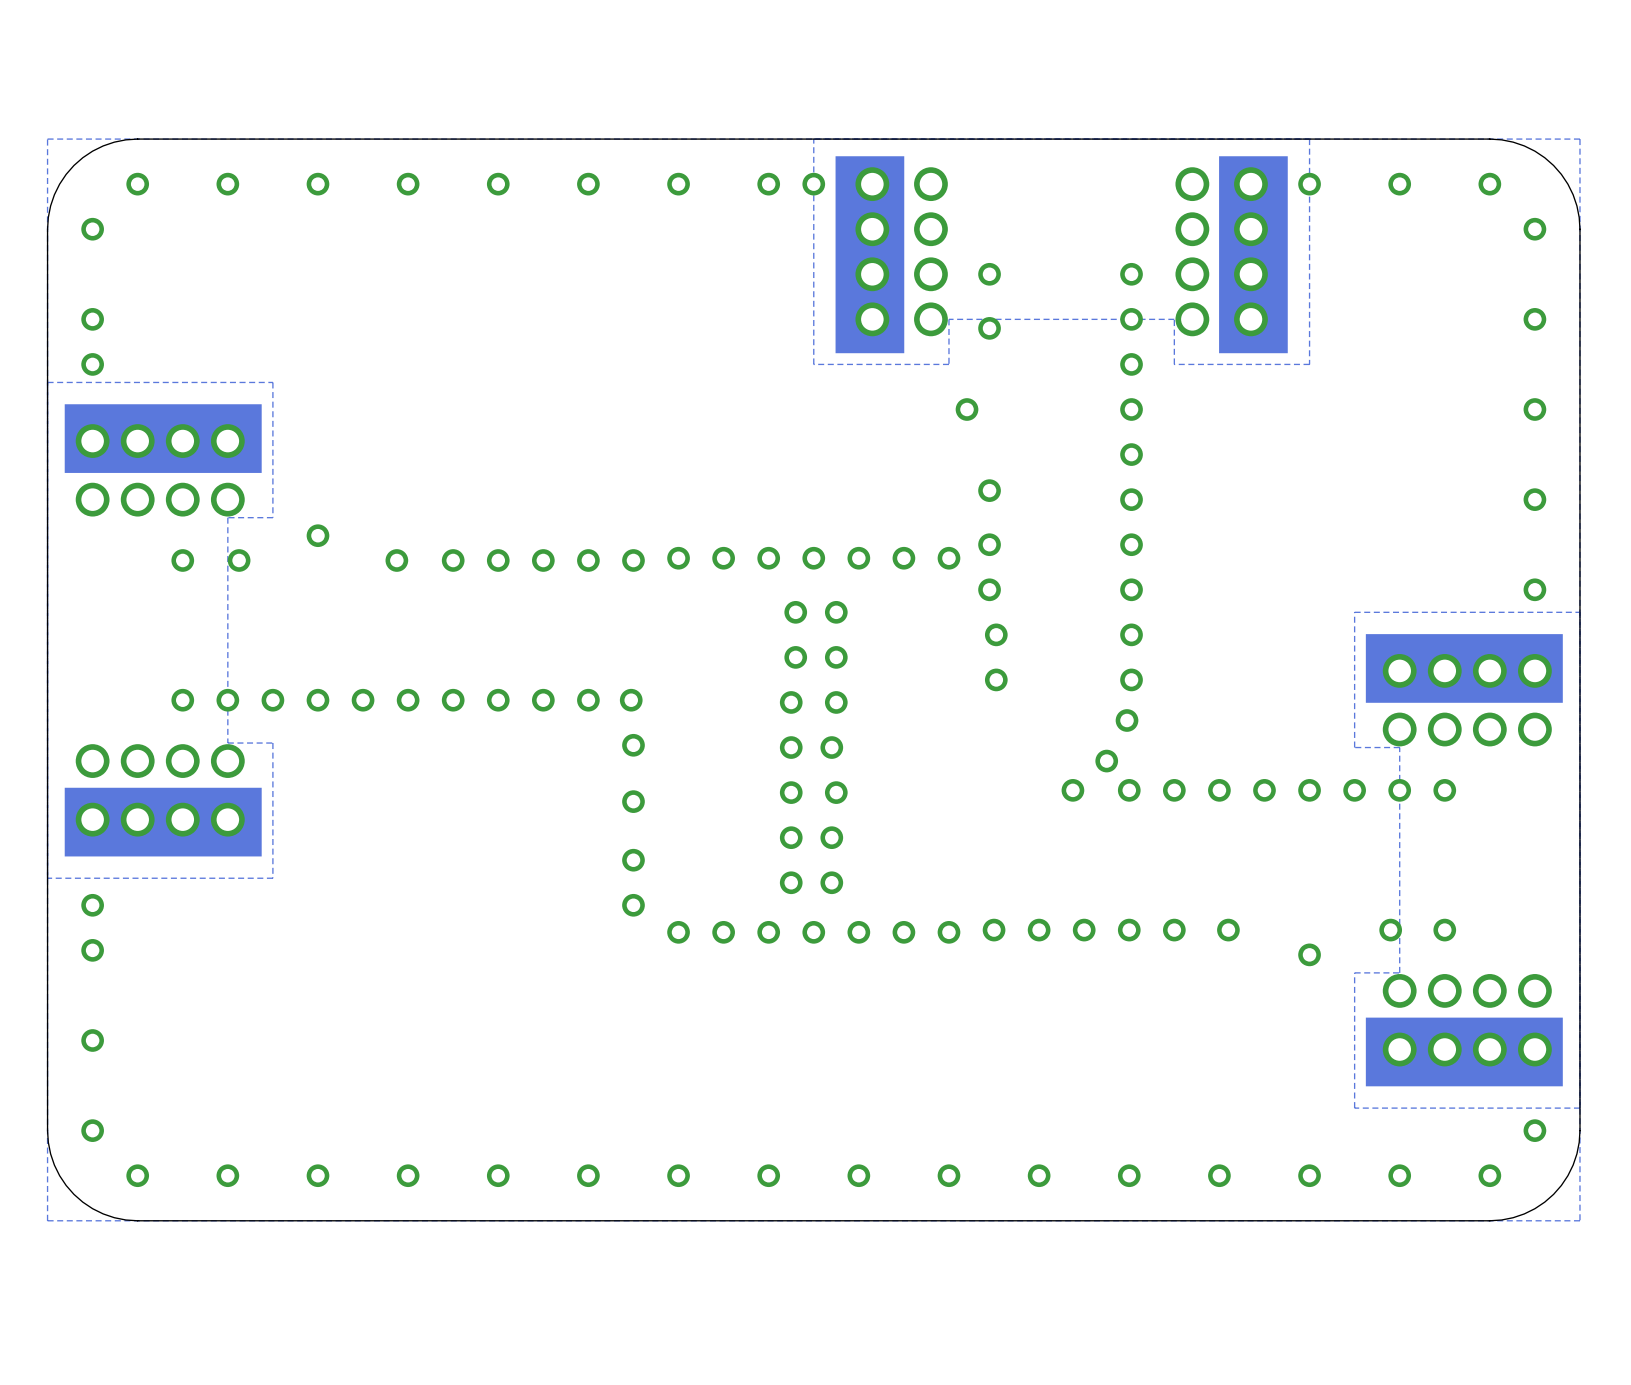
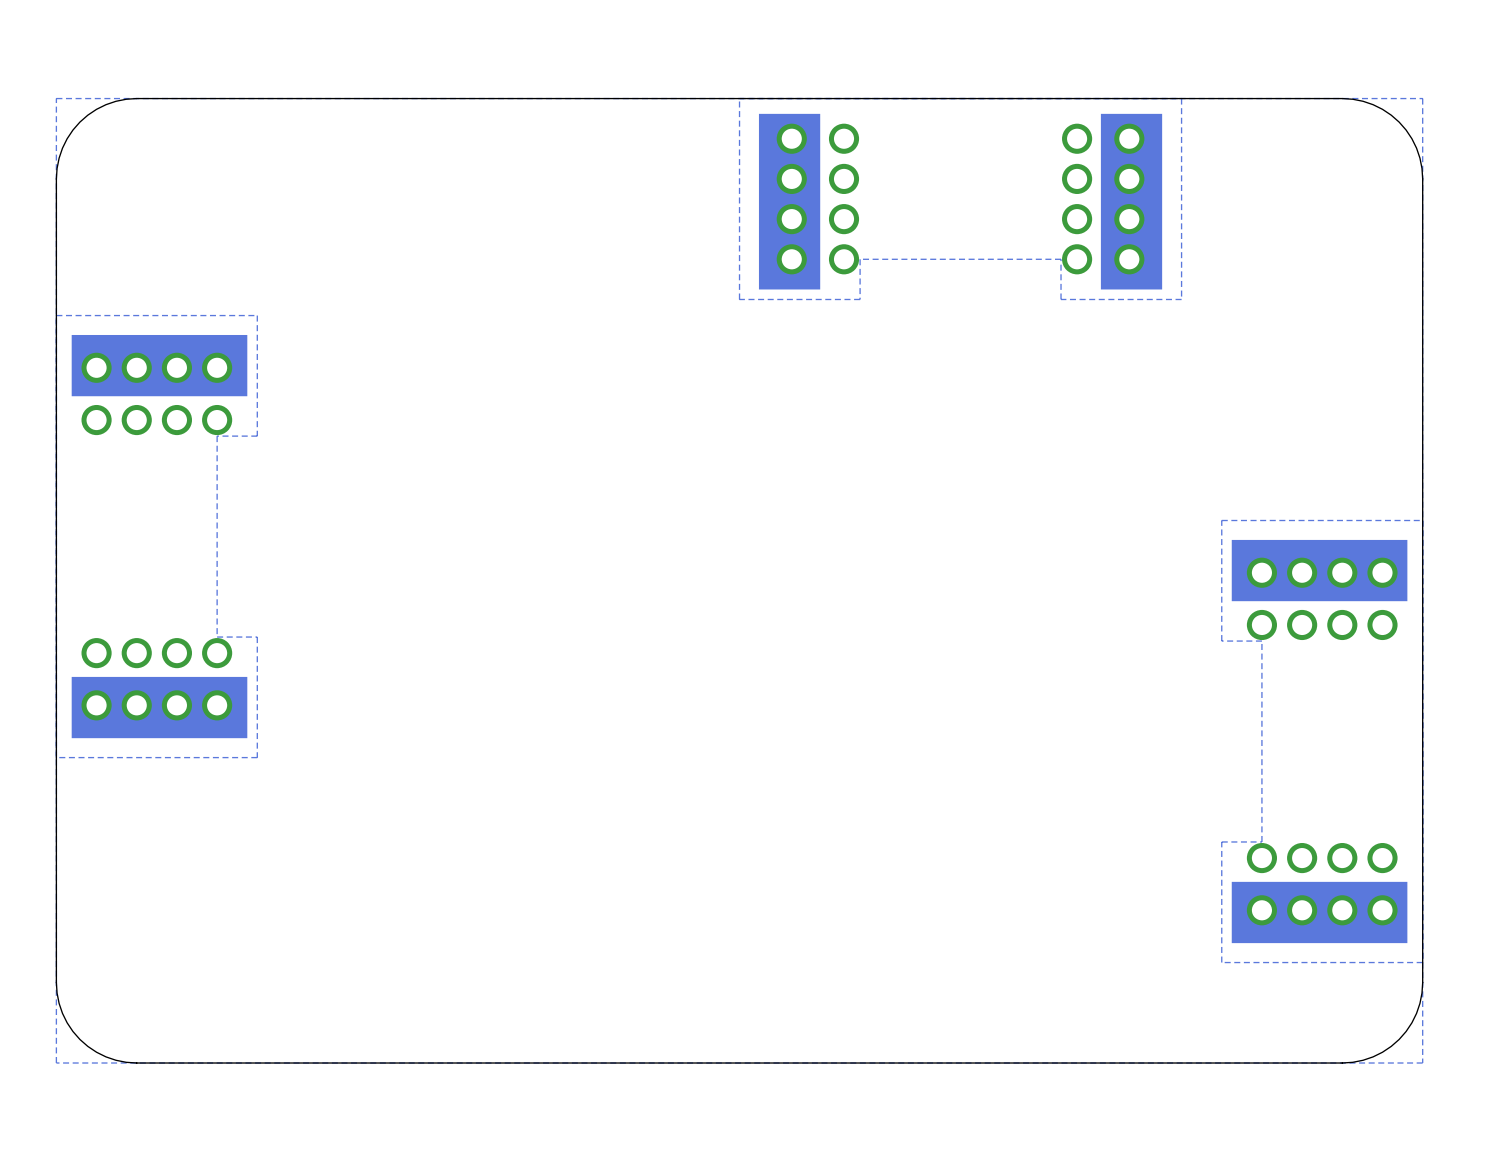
via: (137, 184) -> none
via: (227, 184) -> none
via: (317, 184) -> none
via: (408, 184) -> none
via: (498, 184) -> none
via: (588, 184) -> none
via: (678, 184) -> none
via: (768, 184) -> none
via: (813, 184) -> none
via: (1309, 184) -> none
via: (1399, 184) -> none
via: (1489, 184) -> none
via: (92, 229) -> none
via: (1534, 229) -> none
via: (989, 274) -> none
via: (1131, 274) -> none
via: (92, 319) -> none
via: (1131, 319) -> none
via: (1534, 319) -> none
via: (989, 328) -> none
via: (92, 364) -> none
via: (1131, 364) -> none
via: (967, 409) -> none
via: (1131, 409) -> none
via: (1534, 409) -> none
via: (1131, 454) -> none
via: (989, 490) -> none
via: (1131, 499) -> none
via: (1534, 499) -> none
via: (317, 535) -> none
via: (989, 544) -> none
via: (1131, 544) -> none
via: (678, 558) -> none
via: (723, 558) -> none
via: (768, 558) -> none
via: (813, 558) -> none
via: (858, 558) -> none
via: (903, 558) -> none
via: (948, 558) -> none
via: (182, 560) -> none
via: (239, 560) -> none
via: (396, 560) -> none
via: (453, 560) -> none
via: (498, 560) -> none
via: (543, 560) -> none
via: (588, 560) -> none
via: (633, 560) -> none
via: (989, 589) -> none
via: (1131, 589) -> none
via: (1534, 589) -> none
via: (795, 612) -> none
via: (836, 612) -> none
via: (996, 634) -> none
via: (1131, 634) -> none
via: (795, 657) -> none
via: (836, 657) -> none
via: (996, 679) -> none
via: (1131, 679) -> none
via: (182, 700) -> none
via: (227, 700) -> none
via: (272, 700) -> none
via: (317, 700) -> none
via: (363, 700) -> none
via: (408, 700) -> none
via: (453, 700) -> none
via: (498, 700) -> none
via: (543, 700) -> none
via: (588, 700) -> none
via: (631, 700) -> none
via: (791, 702) -> none
via: (836, 702) -> none
via: (1127, 720) -> none
via: (633, 745) -> none
via: (791, 747) -> none
via: (831, 747) -> none
via: (1106, 761) -> none
via: (1072, 790) -> none
via: (1129, 790) -> none
via: (1174, 790) -> none
via: (1219, 790) -> none
via: (1264, 790) -> none
via: (1309, 790) -> none
via: (1354, 790) -> none
via: (1399, 790) -> none
via: (1444, 790) -> none
via: (791, 792) -> none
via: (836, 792) -> none
via: (633, 801) -> none
via: (791, 837) -> none
via: (831, 837) -> none
via: (633, 860) -> none
via: (791, 882) -> none
via: (831, 882) -> none
via: (92, 905) -> none
via: (633, 905) -> none
via: (994, 930) -> none
via: (1039, 930) -> none
via: (1084, 930) -> none
via: (1129, 930) -> none
via: (1174, 930) -> none
via: (1228, 930) -> none
via: (1390, 930) -> none
via: (1444, 930) -> none
via: (678, 932) -> none
via: (723, 932) -> none
via: (768, 932) -> none
via: (813, 932) -> none
via: (858, 932) -> none
via: (903, 932) -> none
via: (948, 932) -> none
via: (92, 950) -> none
via: (1309, 954) -> none
via: (92, 1040) -> none
via: (92, 1130) -> none
via: (1534, 1130) -> none
via: (137, 1175) -> none
via: (227, 1175) -> none
via: (317, 1175) -> none
via: (408, 1175) -> none
via: (498, 1175) -> none
via: (588, 1175) -> none
via: (678, 1175) -> none
via: (768, 1175) -> none
via: (858, 1175) -> none
via: (948, 1175) -> none
via: (1039, 1175) -> none
via: (1129, 1175) -> none
via: (1219, 1175) -> none
via: (1309, 1175) -> none
via: (1399, 1175) -> none
via: (1489, 1175) -> none

